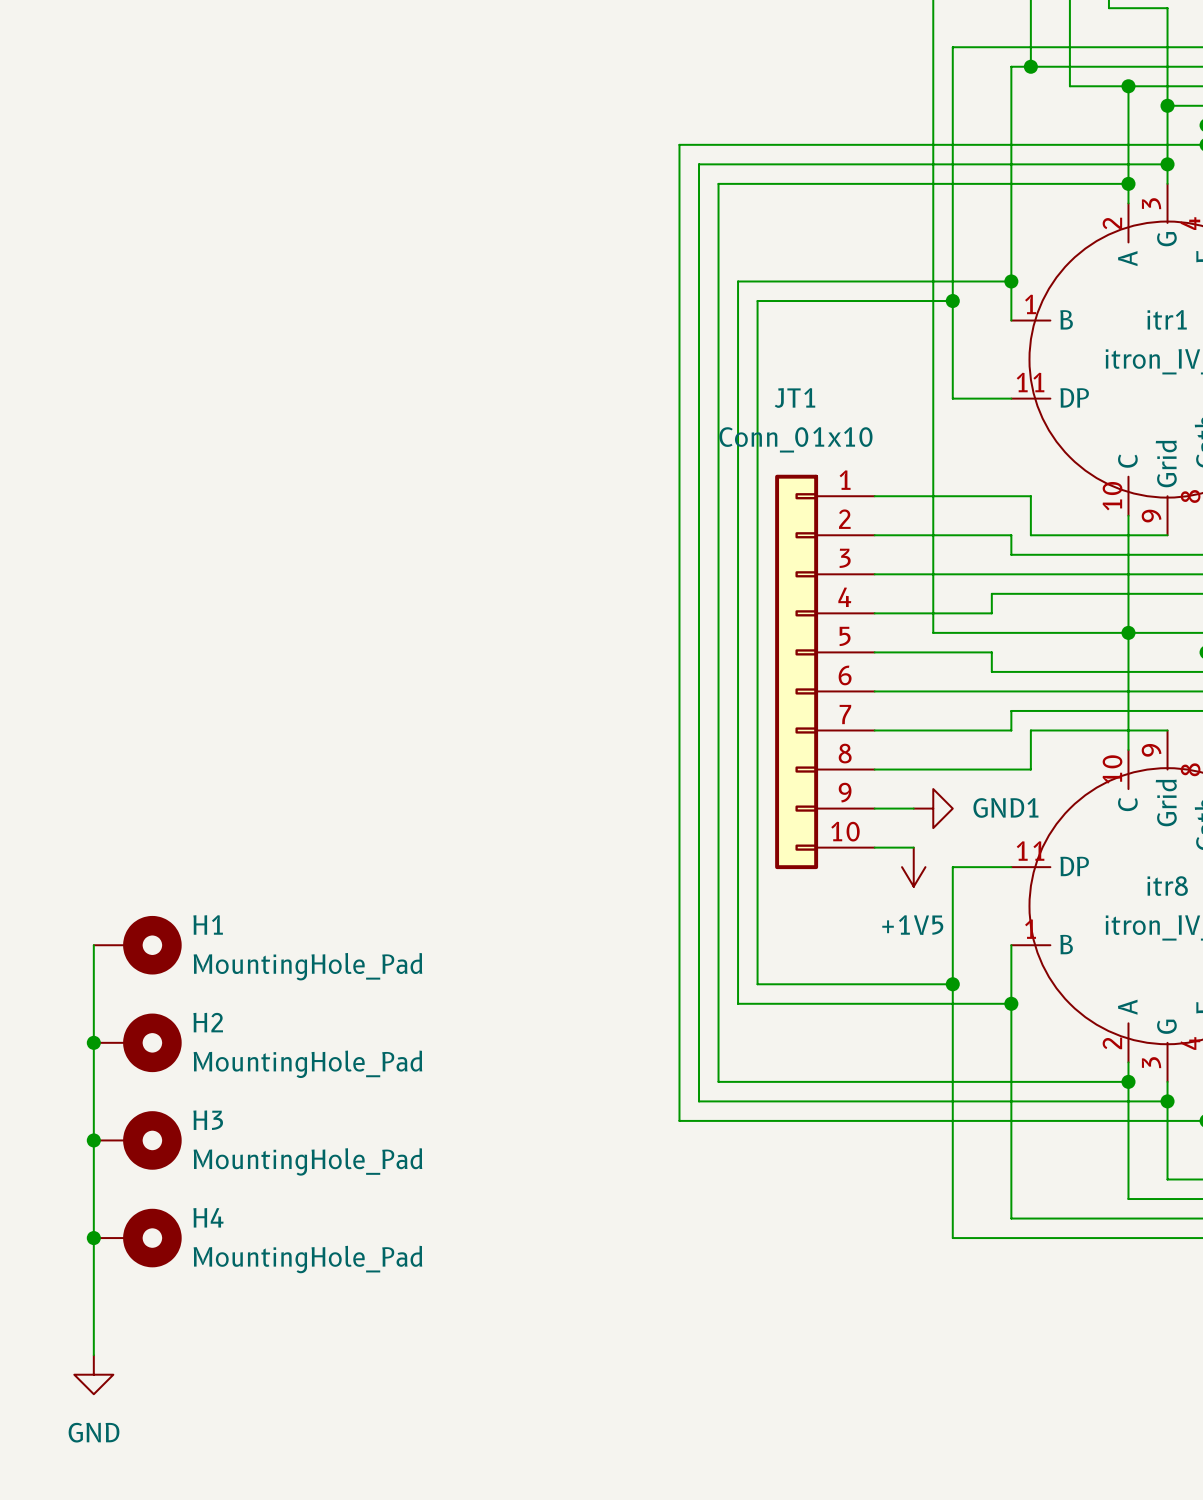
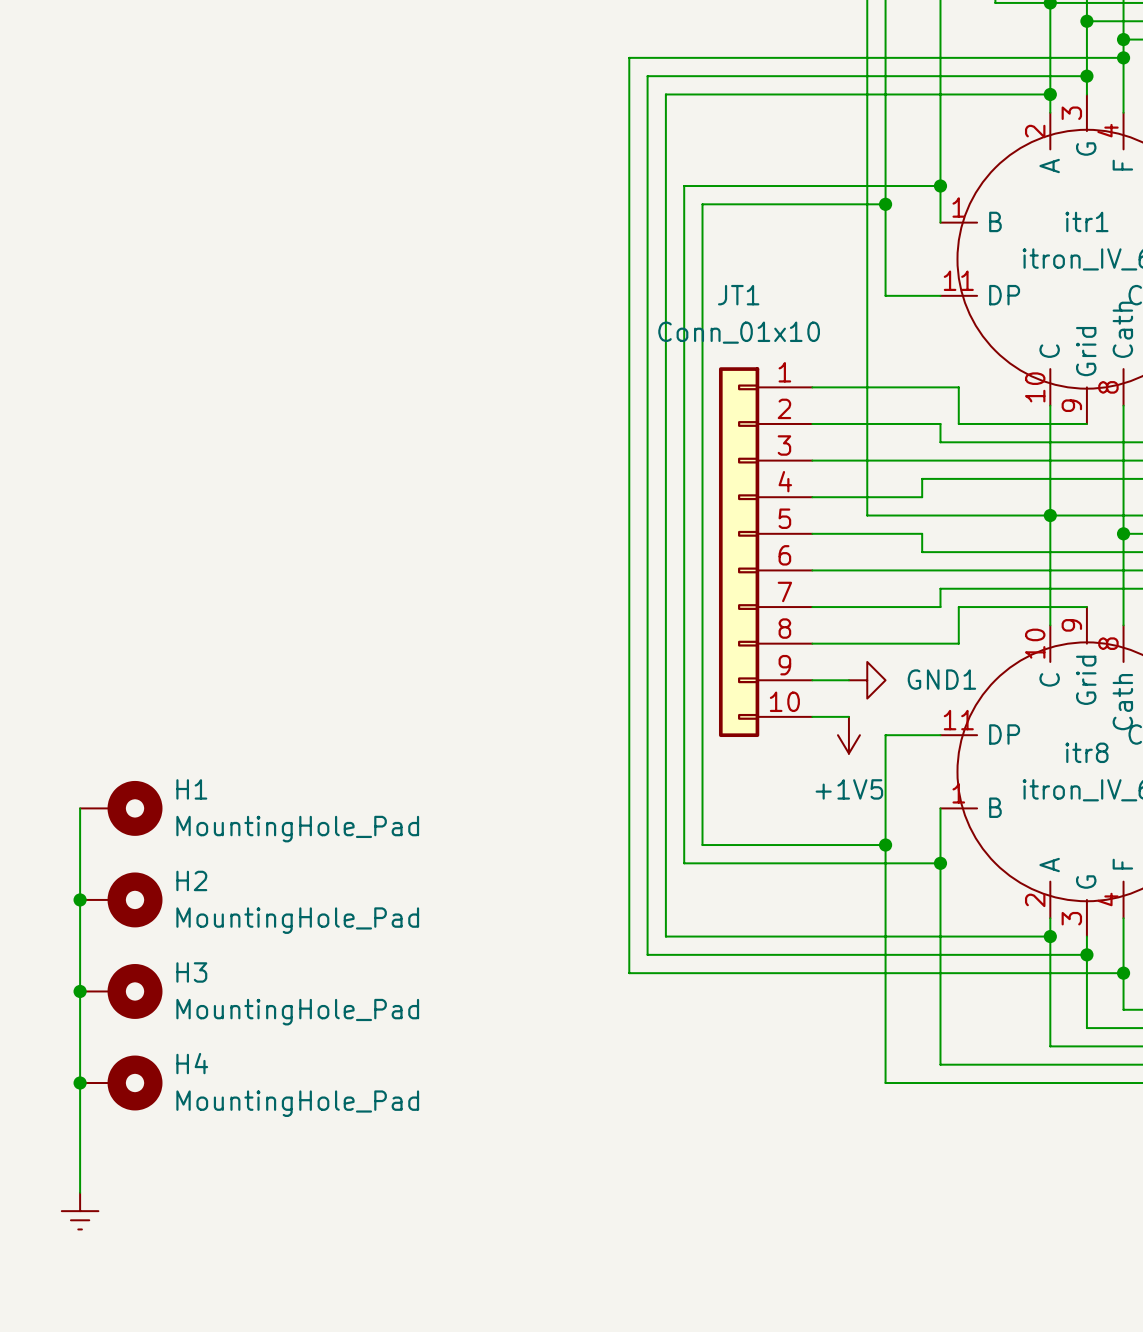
power symbol shape: [74, 1355, 114, 1395] -> [61, 1192, 99, 1230]
power symbol text: GND (94, 1432) -> none

